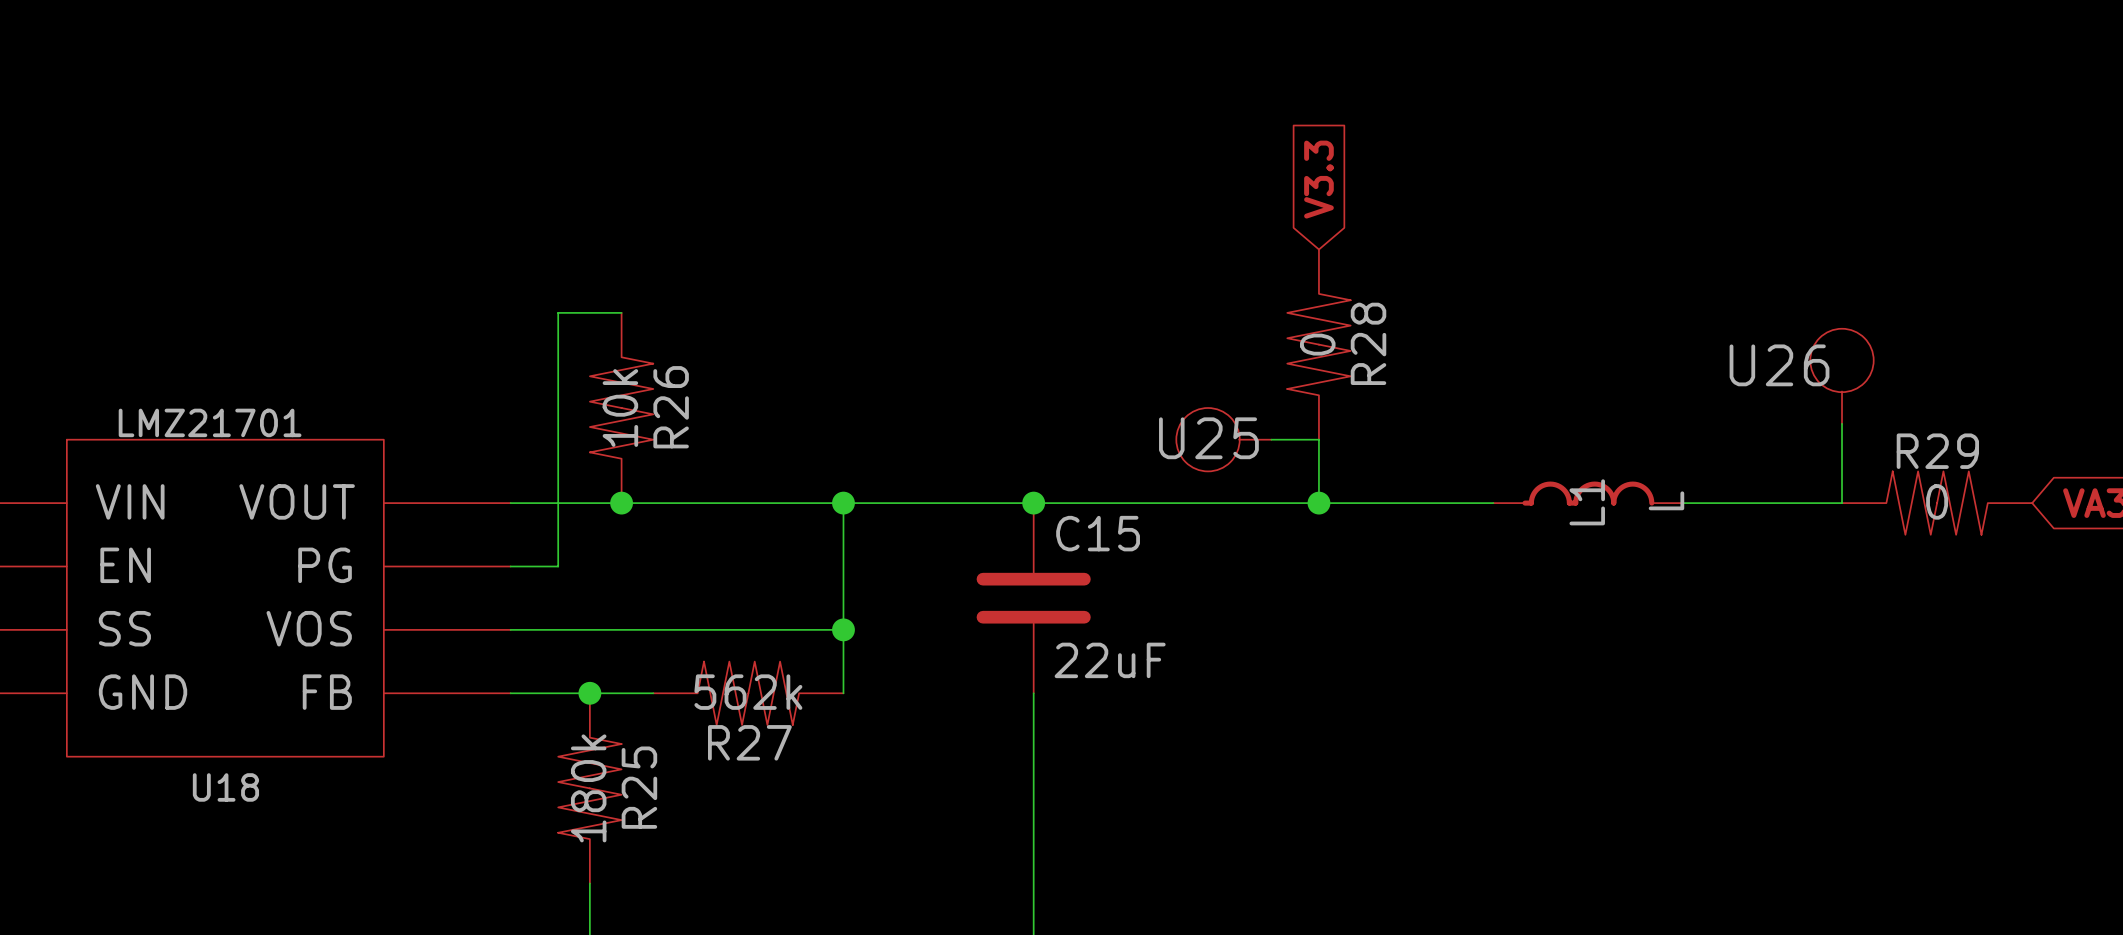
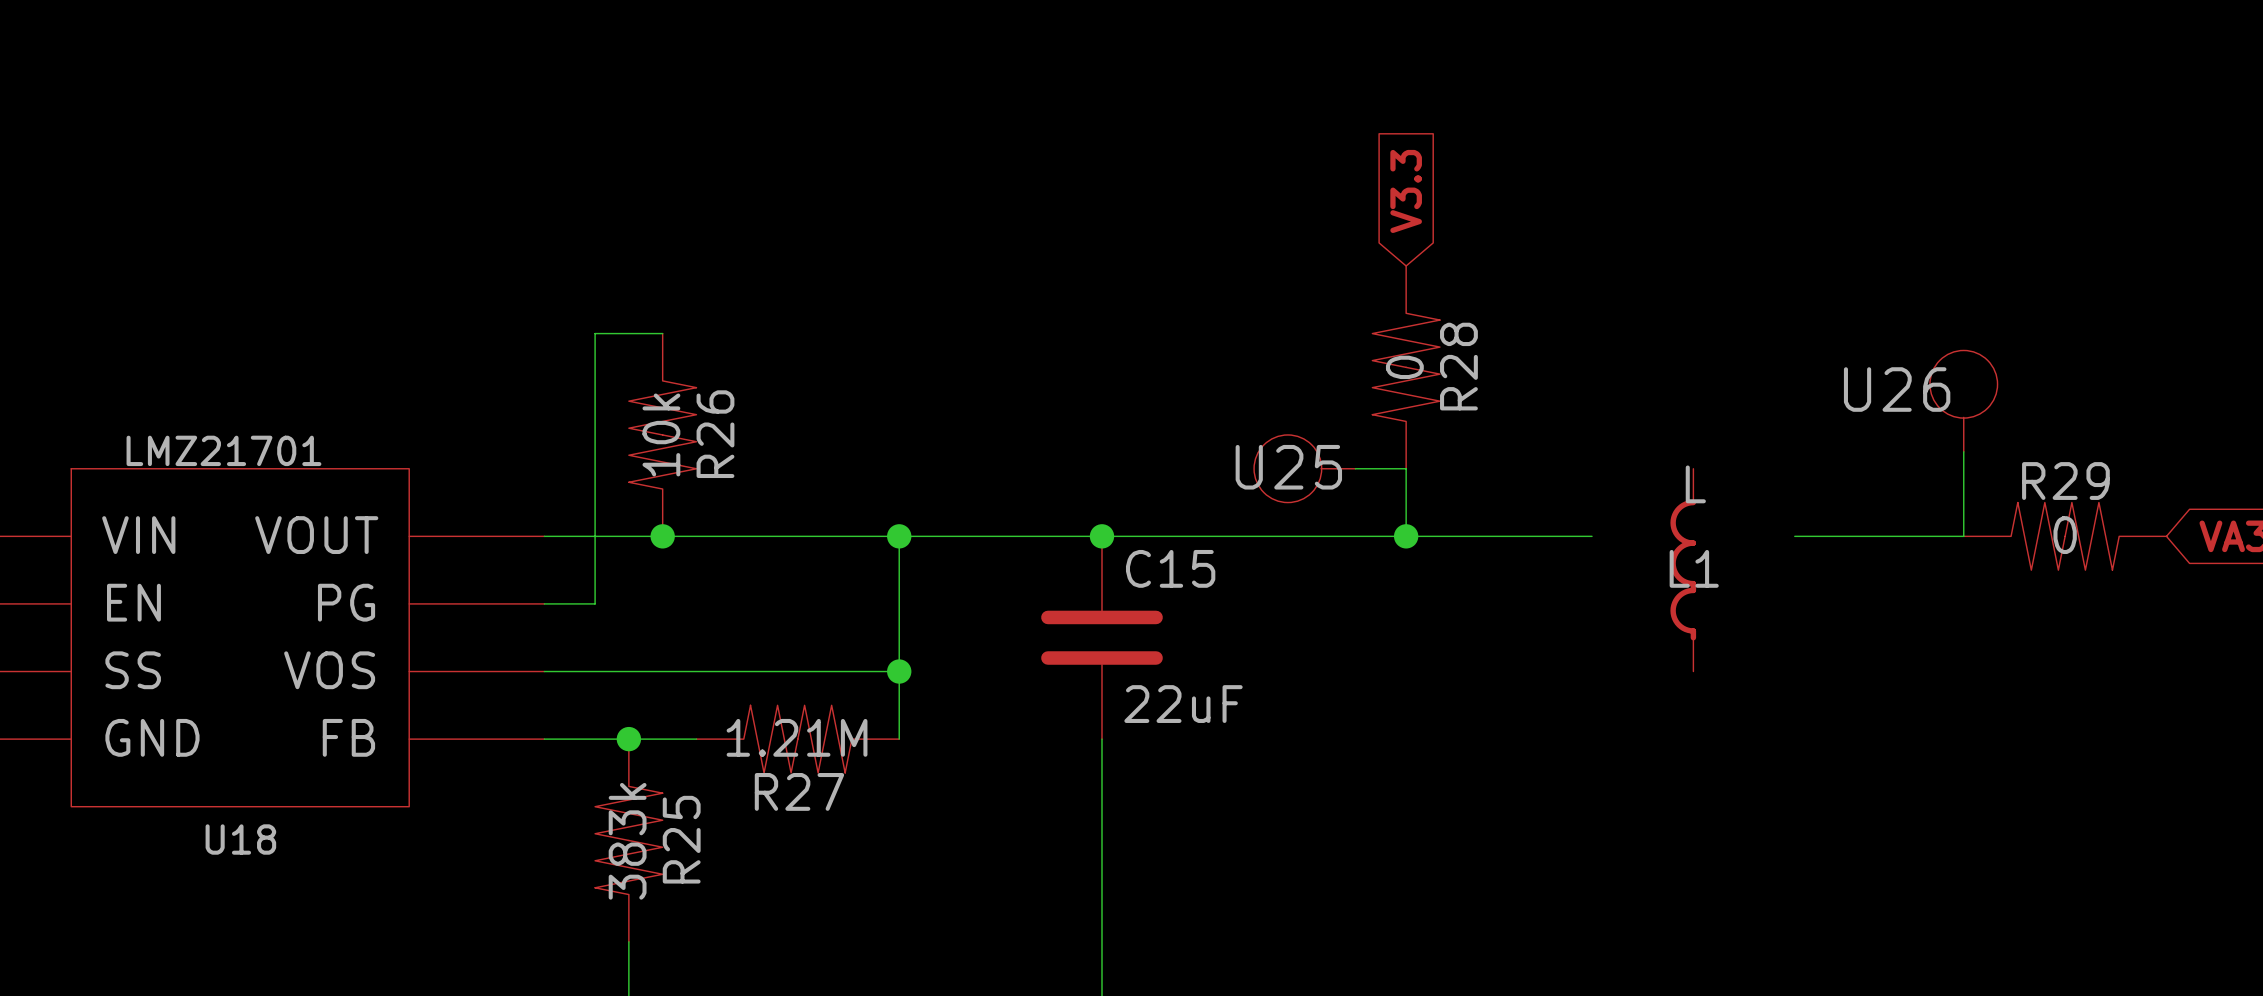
L1 rotation: 0° (1588, 493) -> 90° counterclockwise (1683, 570)
R27 value: 562k (748, 692) -> 1.21M (797, 737)
R25 value: 180k (588, 788) -> 383k (627, 841)

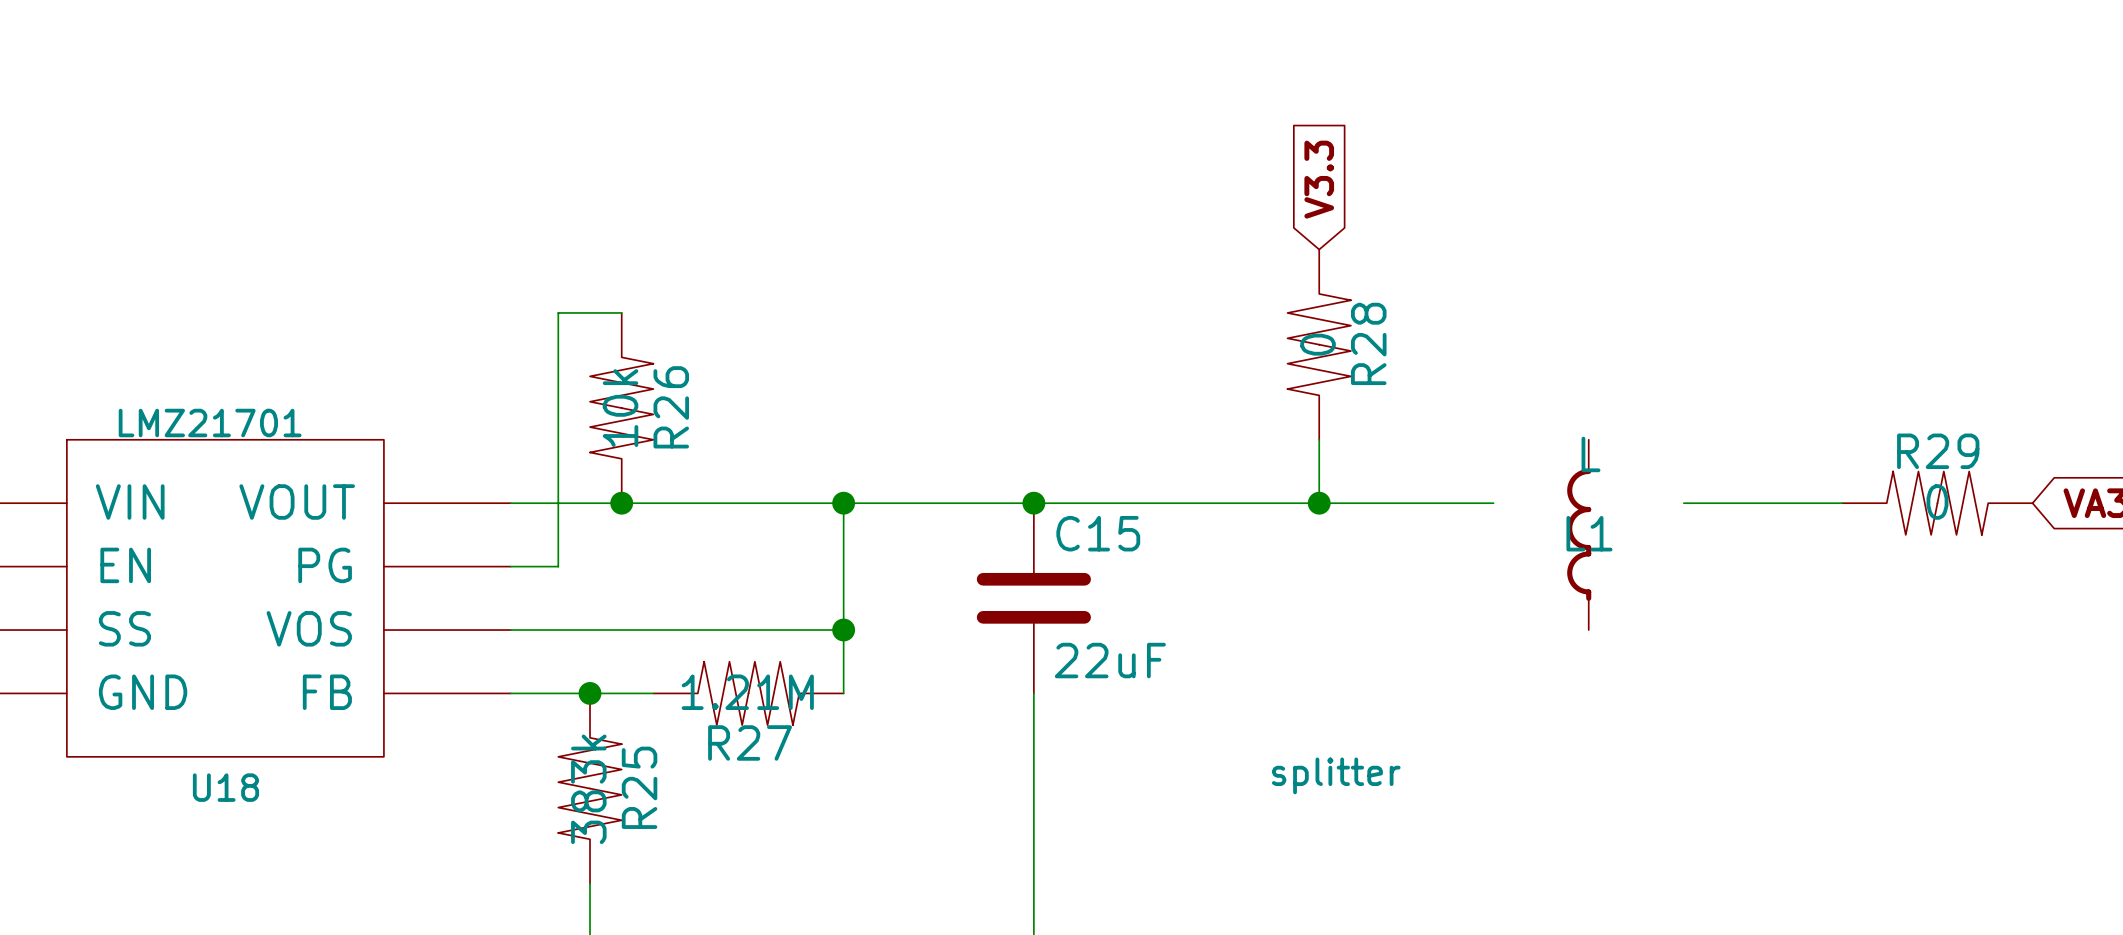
U26: (1963, 401) -> none
wire: (1963, 451) (1963, 536) -> none
U25: (1304, 468) -> none
wire: (1355, 468) (1406, 468) -> none
part value: none -> splitter (1336, 775)

